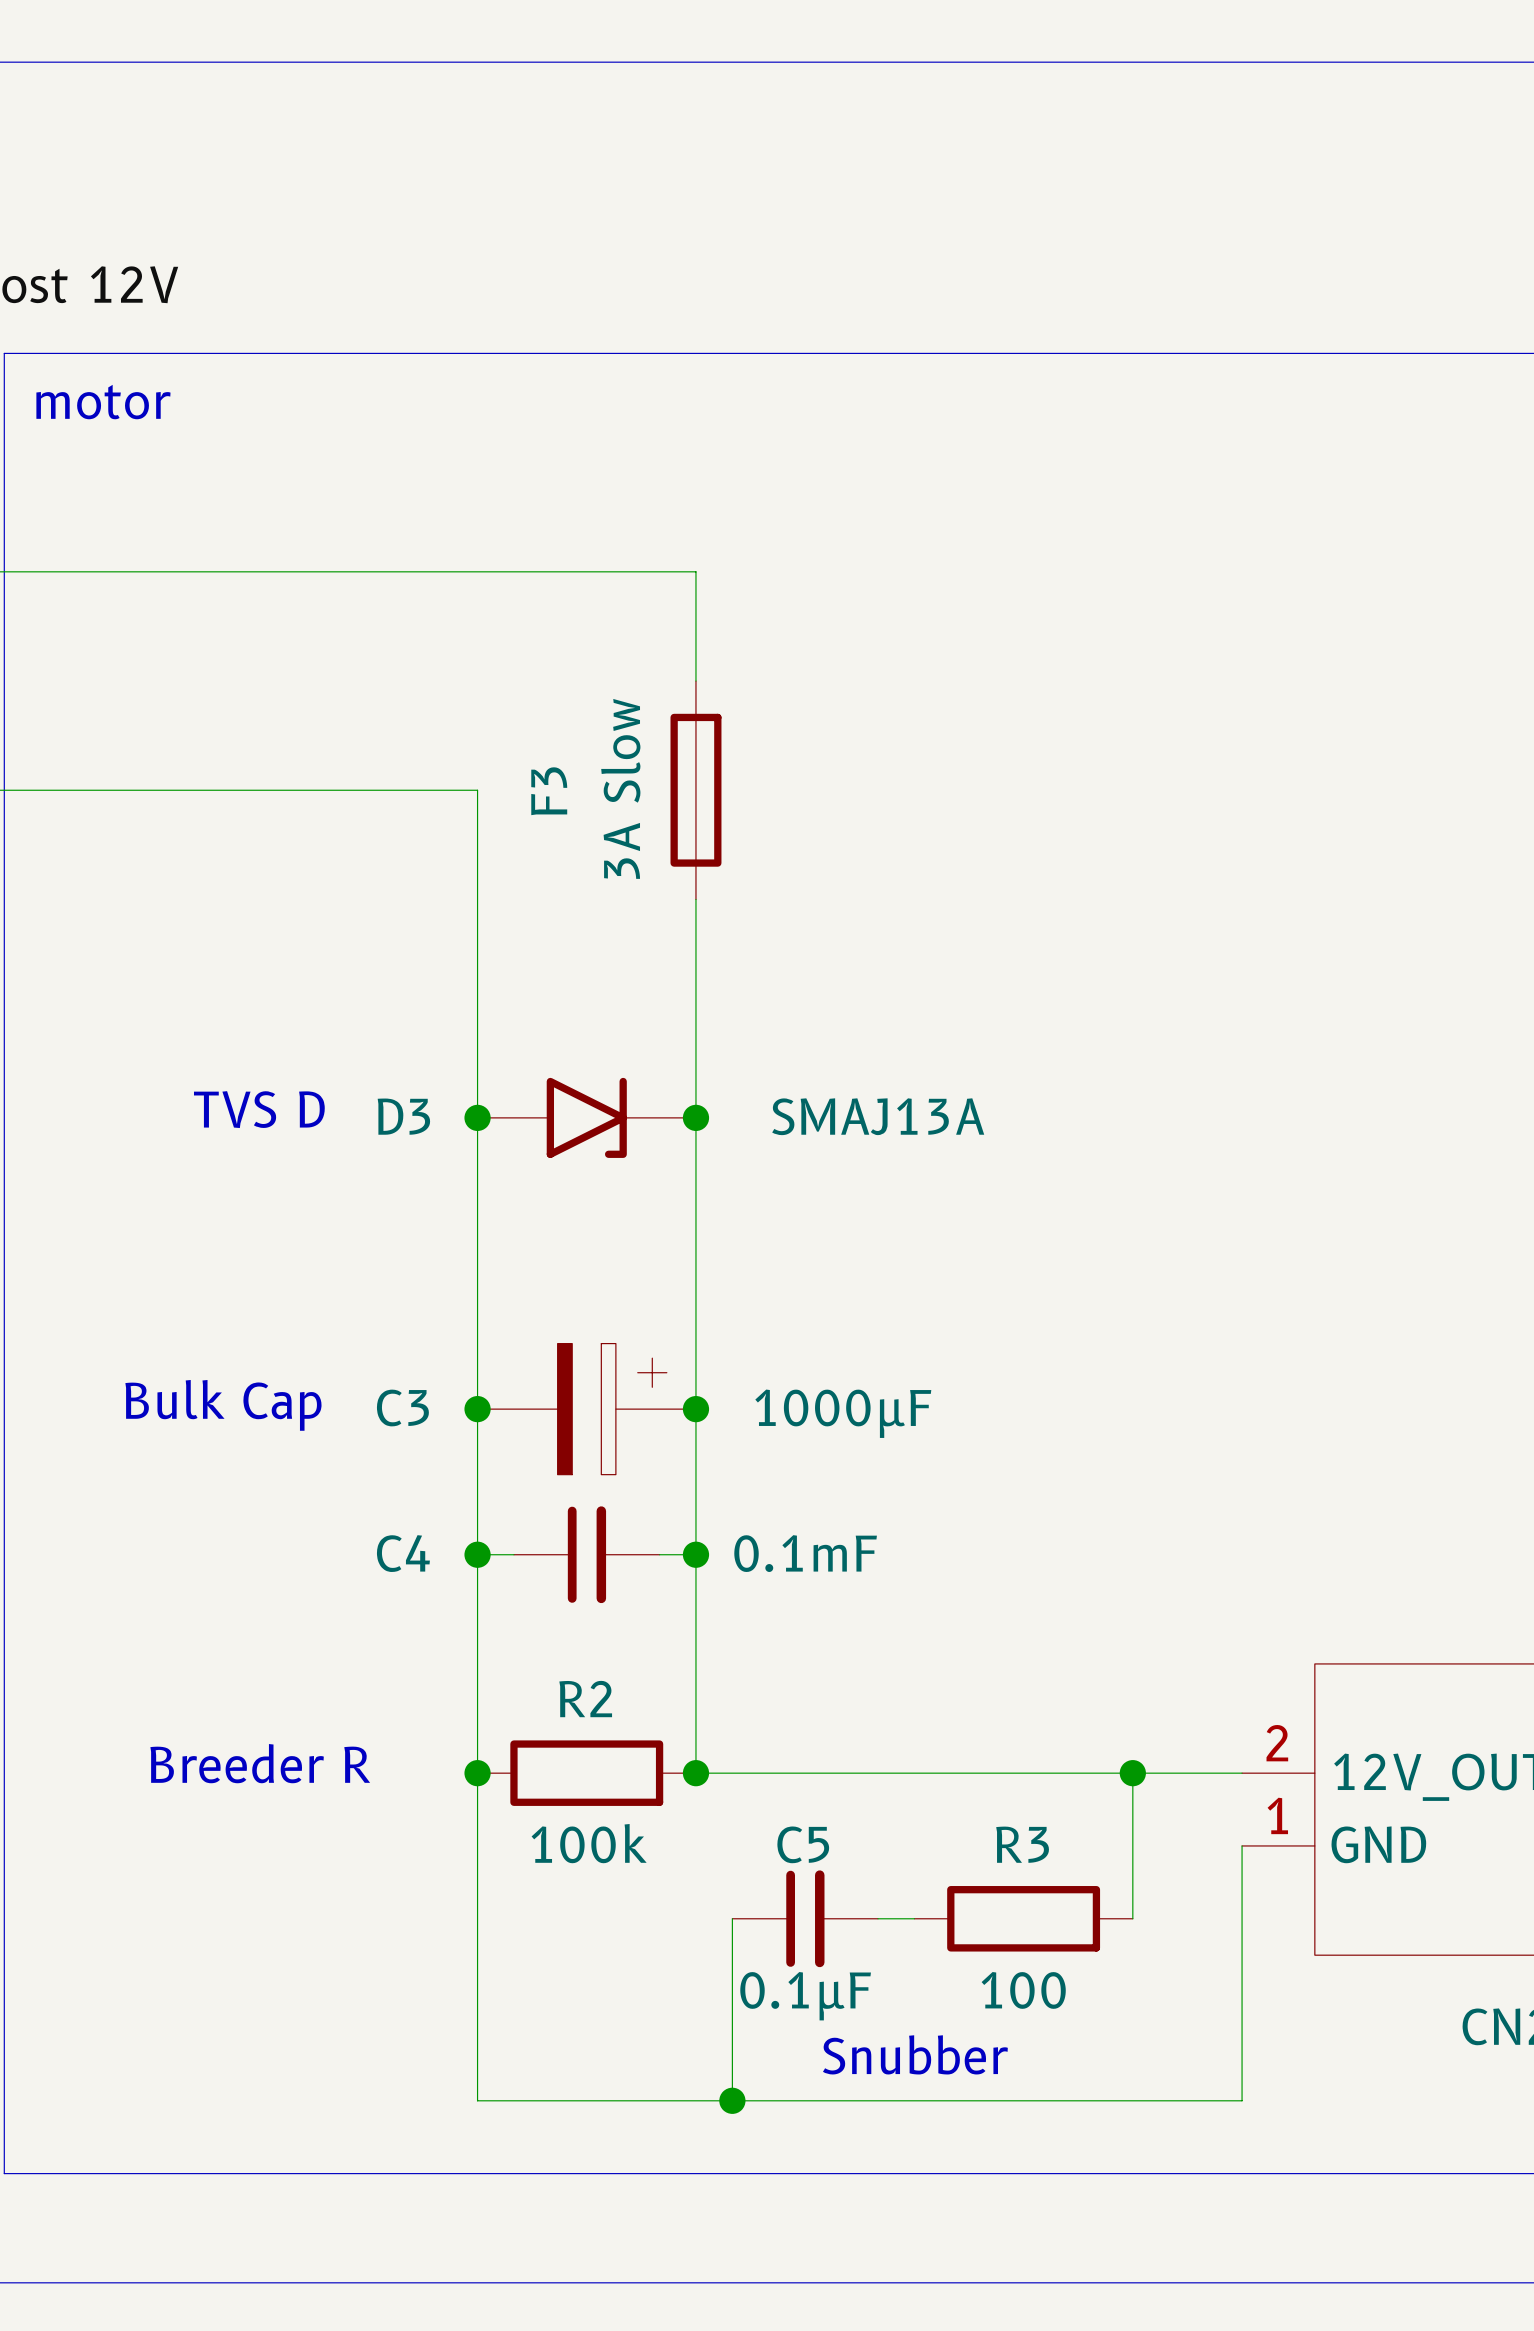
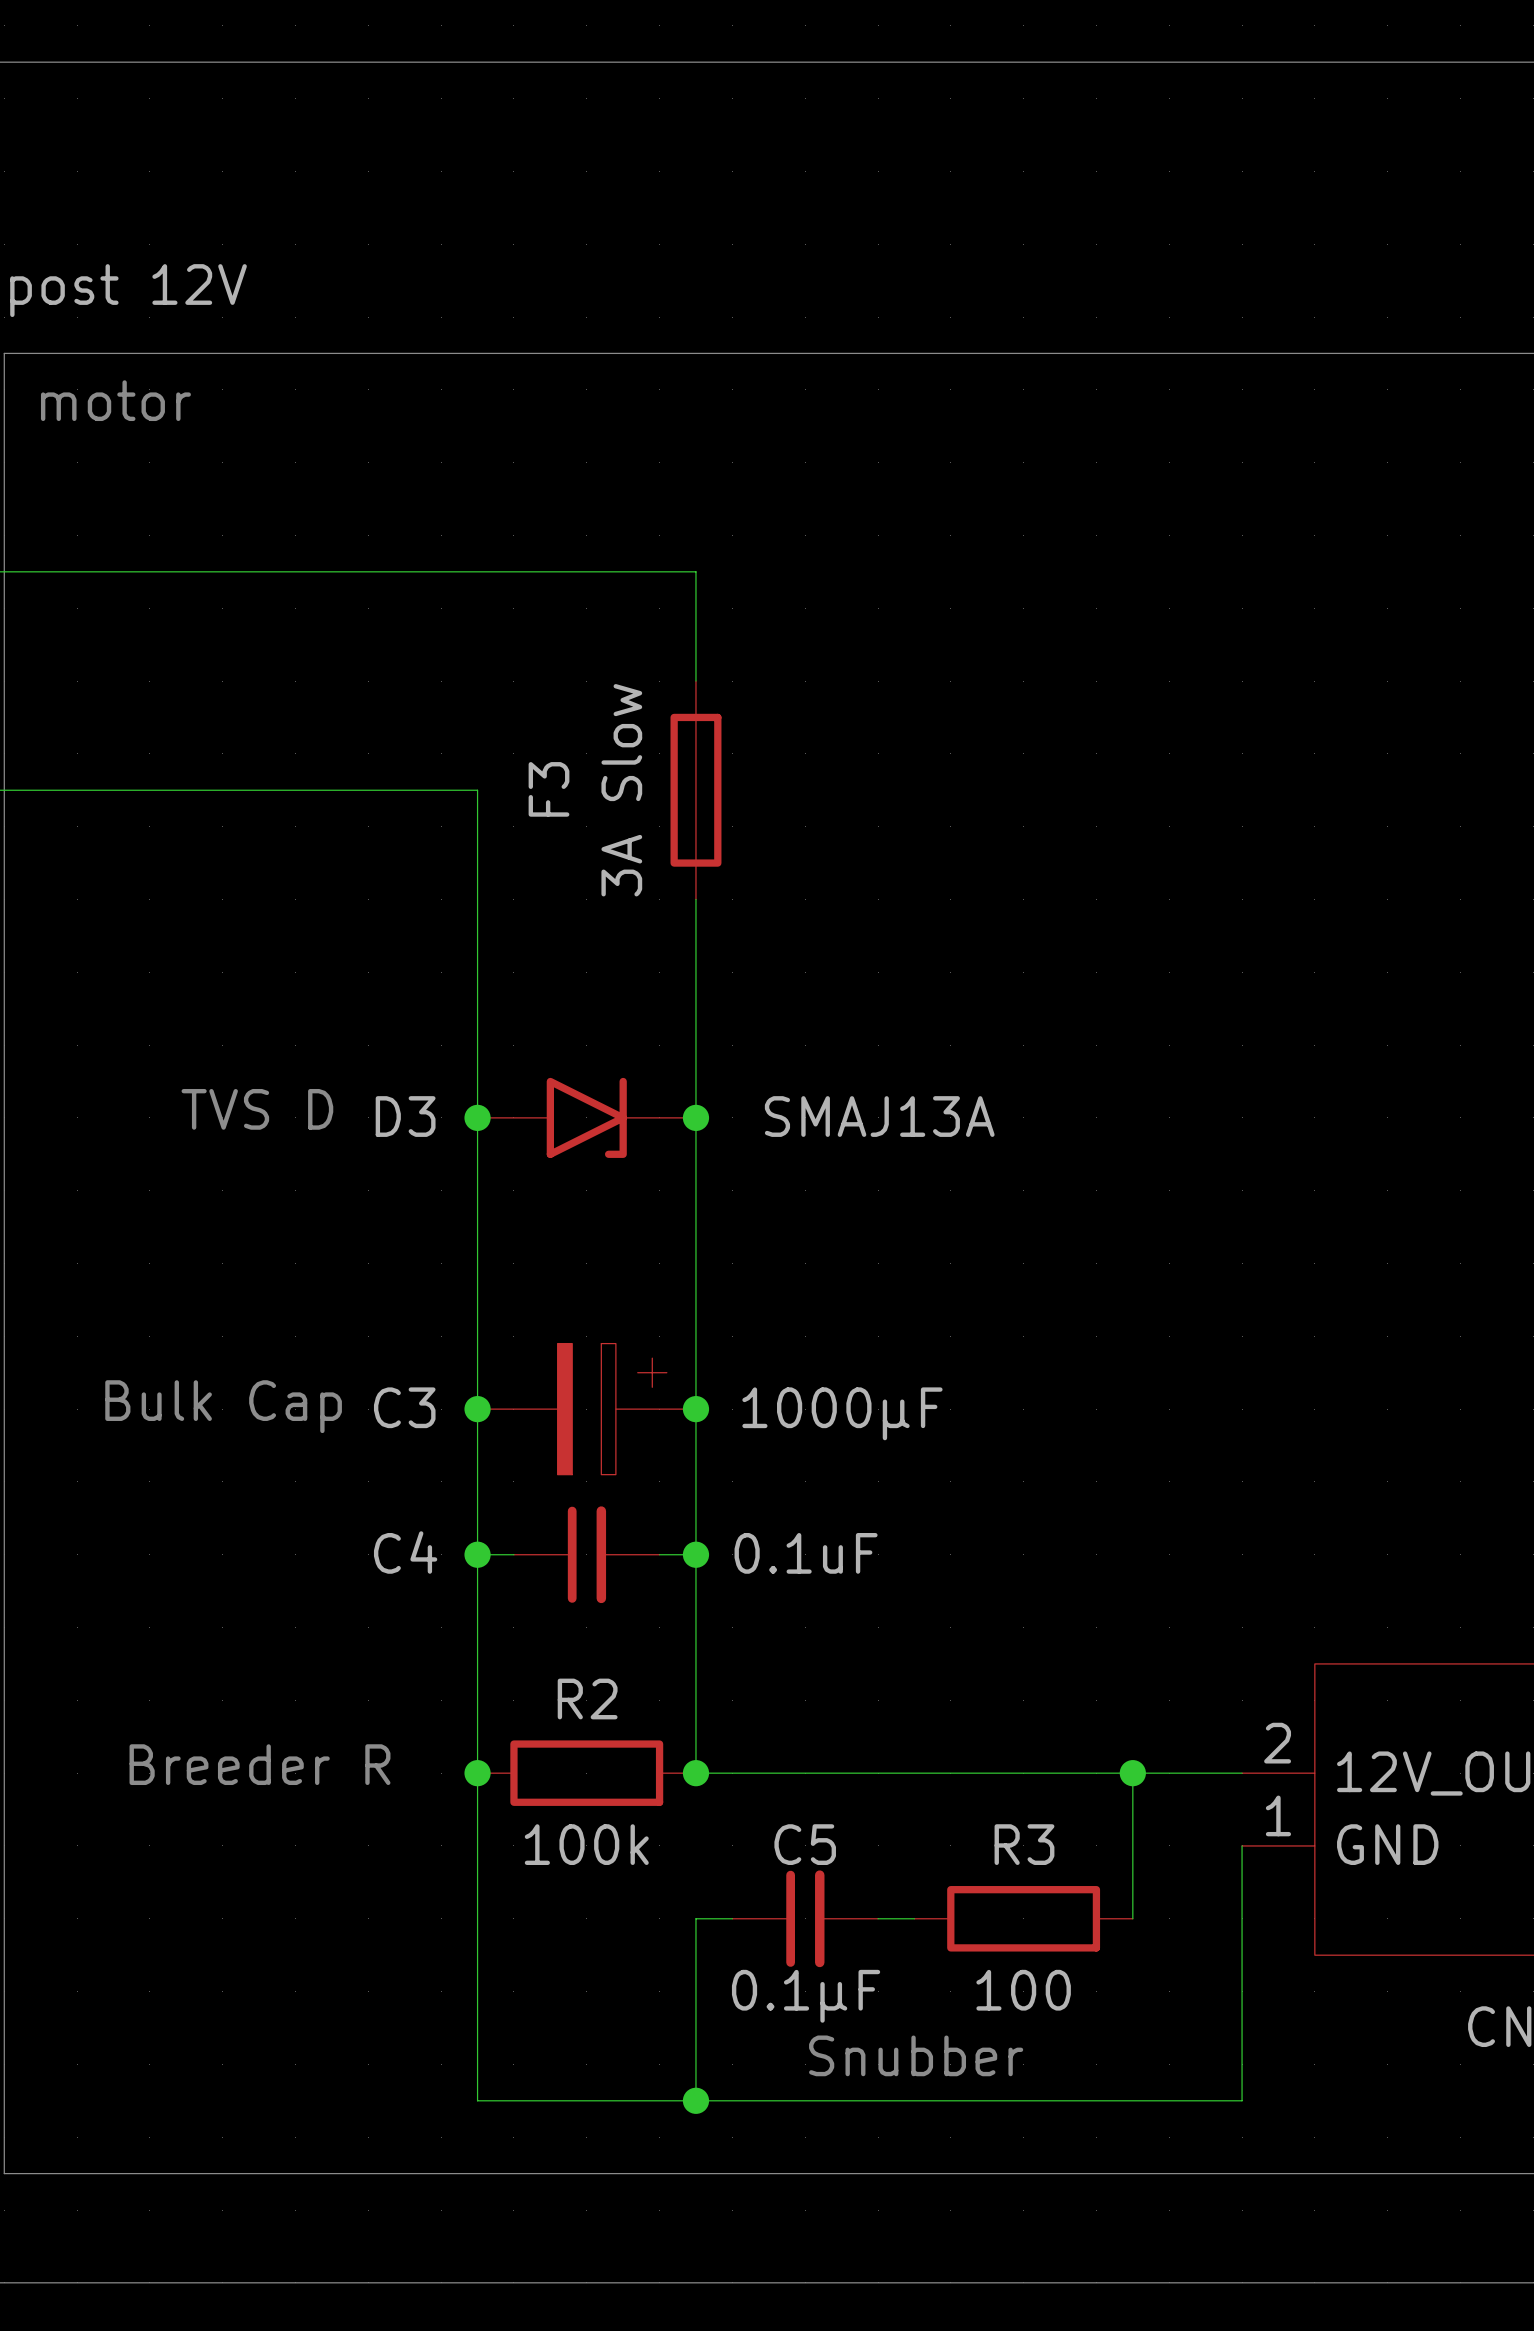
C4 value: 0.1mF (805, 1553) -> 0.1uF (806, 1553)
wire: (732, 1918) (732, 2100) -> (732, 1918) (695, 1918) (695, 2100)
junction position: (732, 2100) -> (695, 2100)

